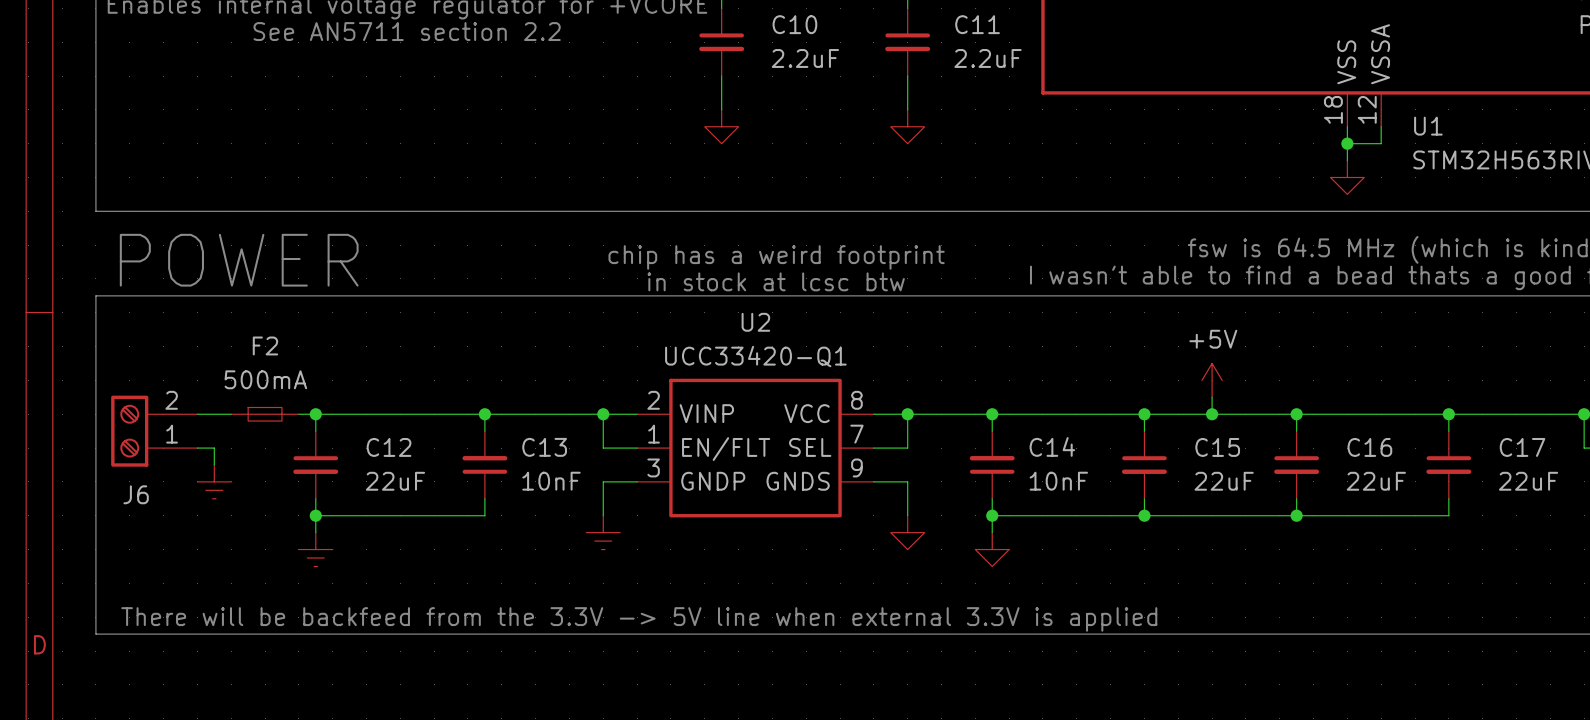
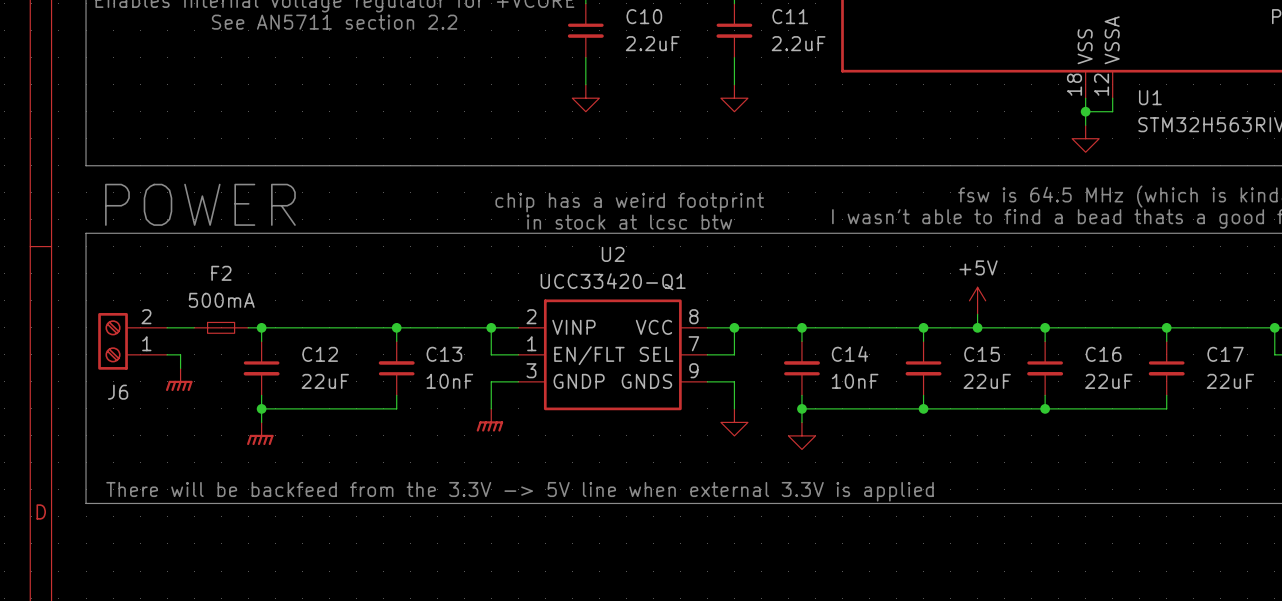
power symbol shape: [197, 464, 232, 499] -> [165, 368, 193, 392]
power symbol shape: [586, 515, 621, 550] -> [476, 408, 504, 432]
power symbol shape: [298, 532, 333, 567] -> [247, 422, 274, 446]

